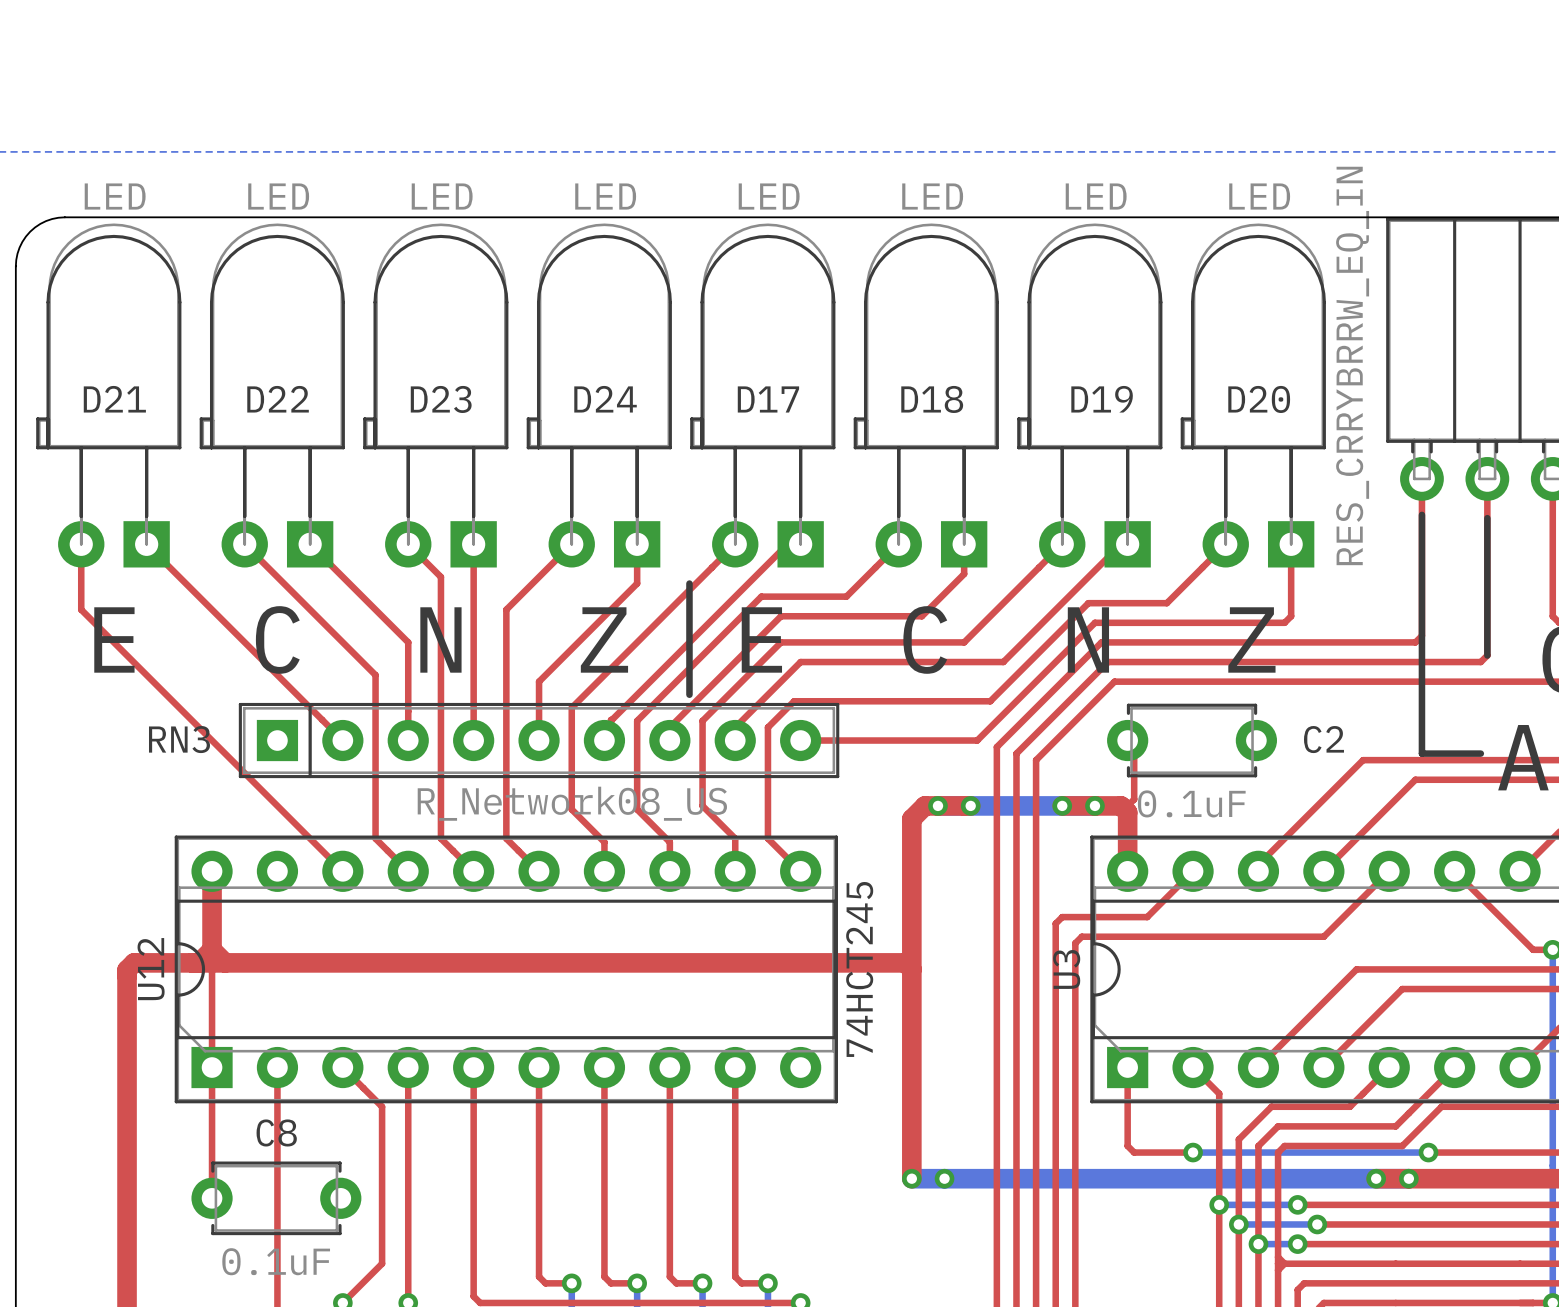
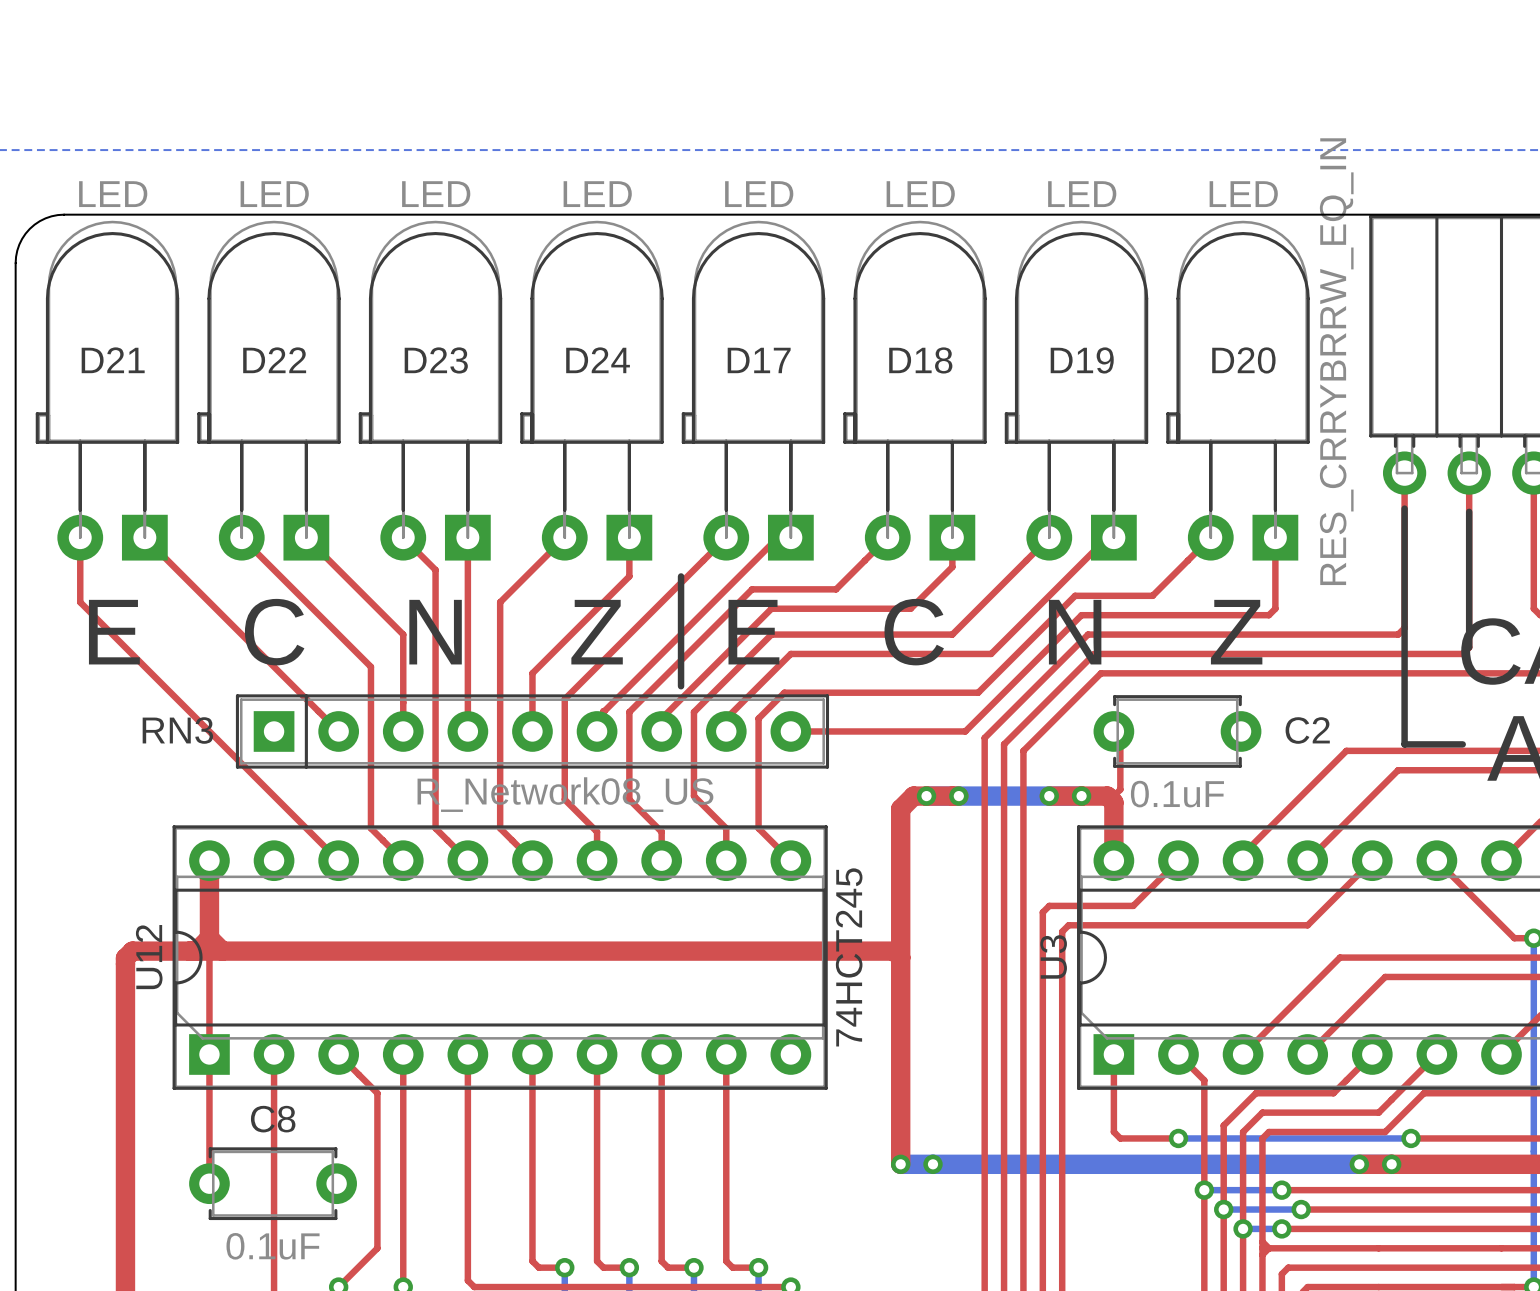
D21 name position: D21 (114, 399) -> D21 (113, 360)
D22 name position: D22 (278, 399) -> D22 (274, 360)
D23 name position: D23 (441, 399) -> D23 (436, 360)
D24 name position: D24 (605, 399) -> D24 (598, 360)
D17 name position: D17 (768, 399) -> D17 (759, 360)
D18 name position: D18 (932, 399) -> D18 (920, 360)
D19 name position: D19 (1102, 399) -> D19 (1082, 360)
D20 name position: D20 (1259, 399) -> D20 (1243, 360)

